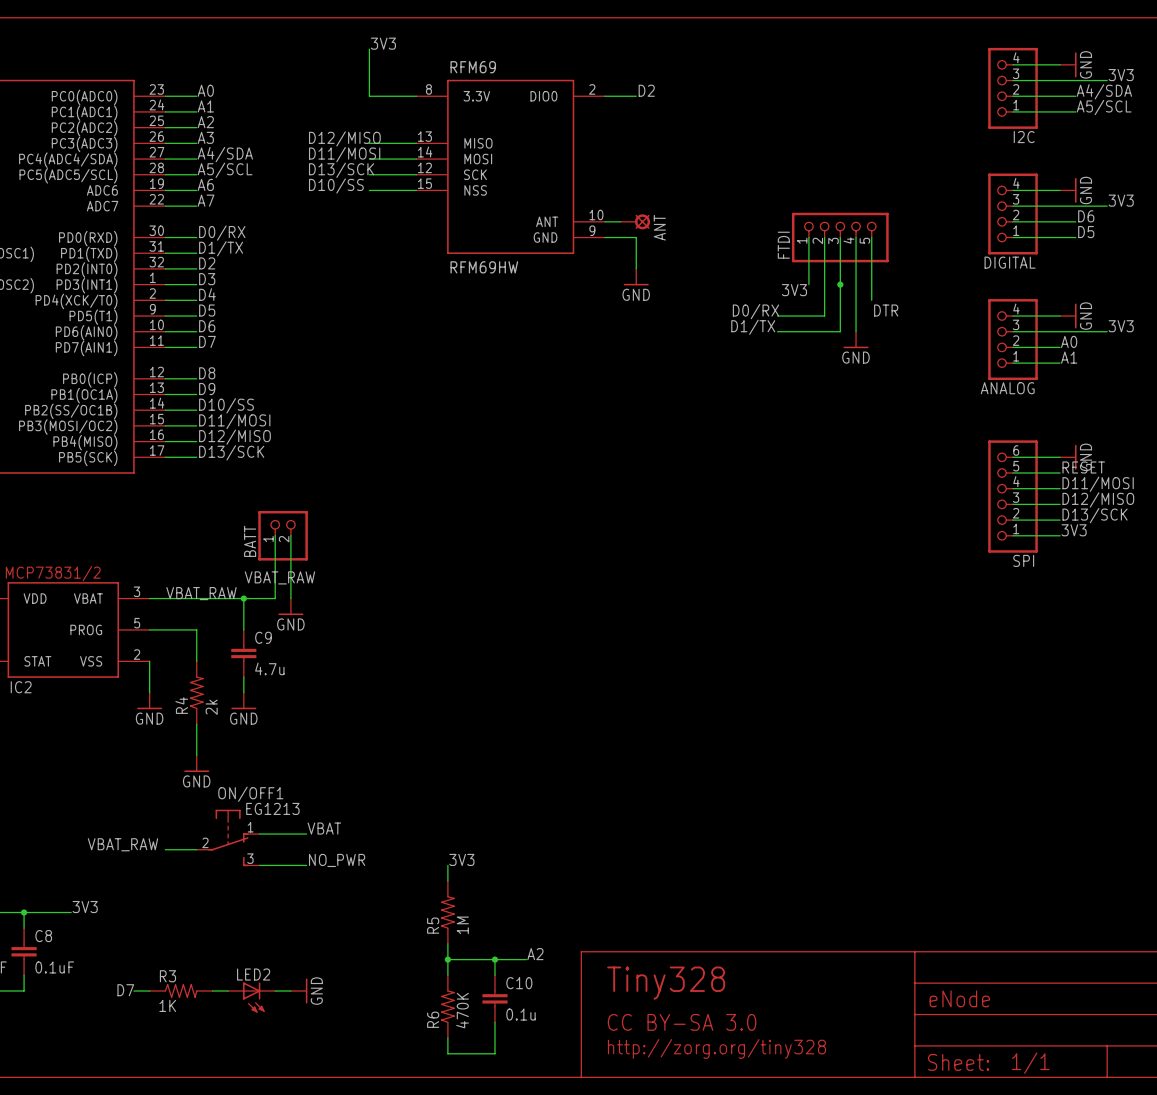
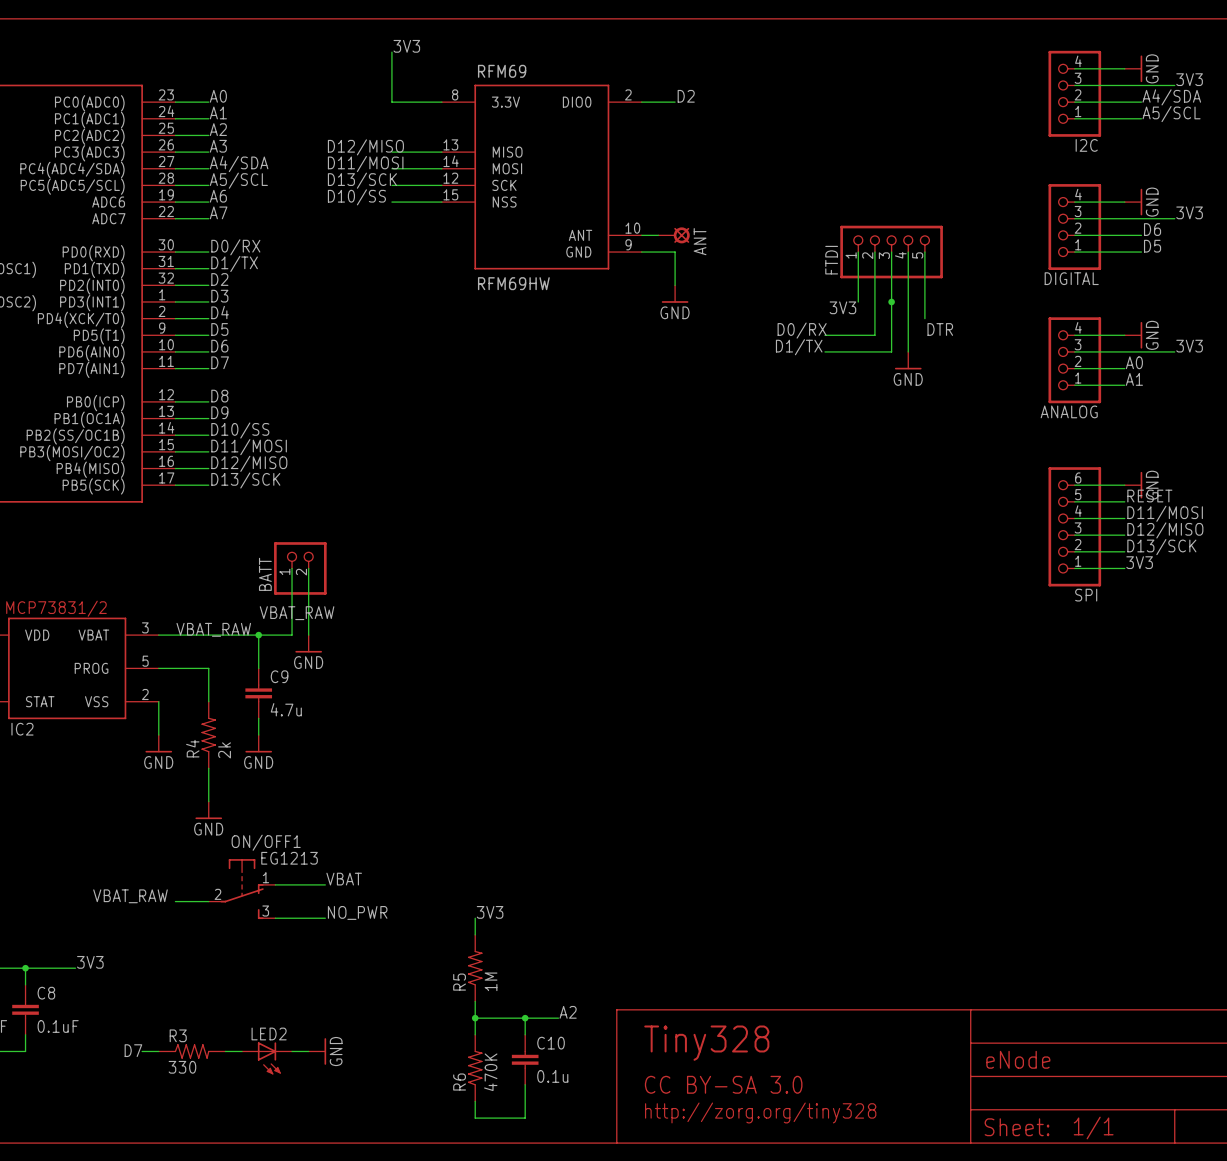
R3 value: 1K (167, 1005) -> 330 (182, 1067)

